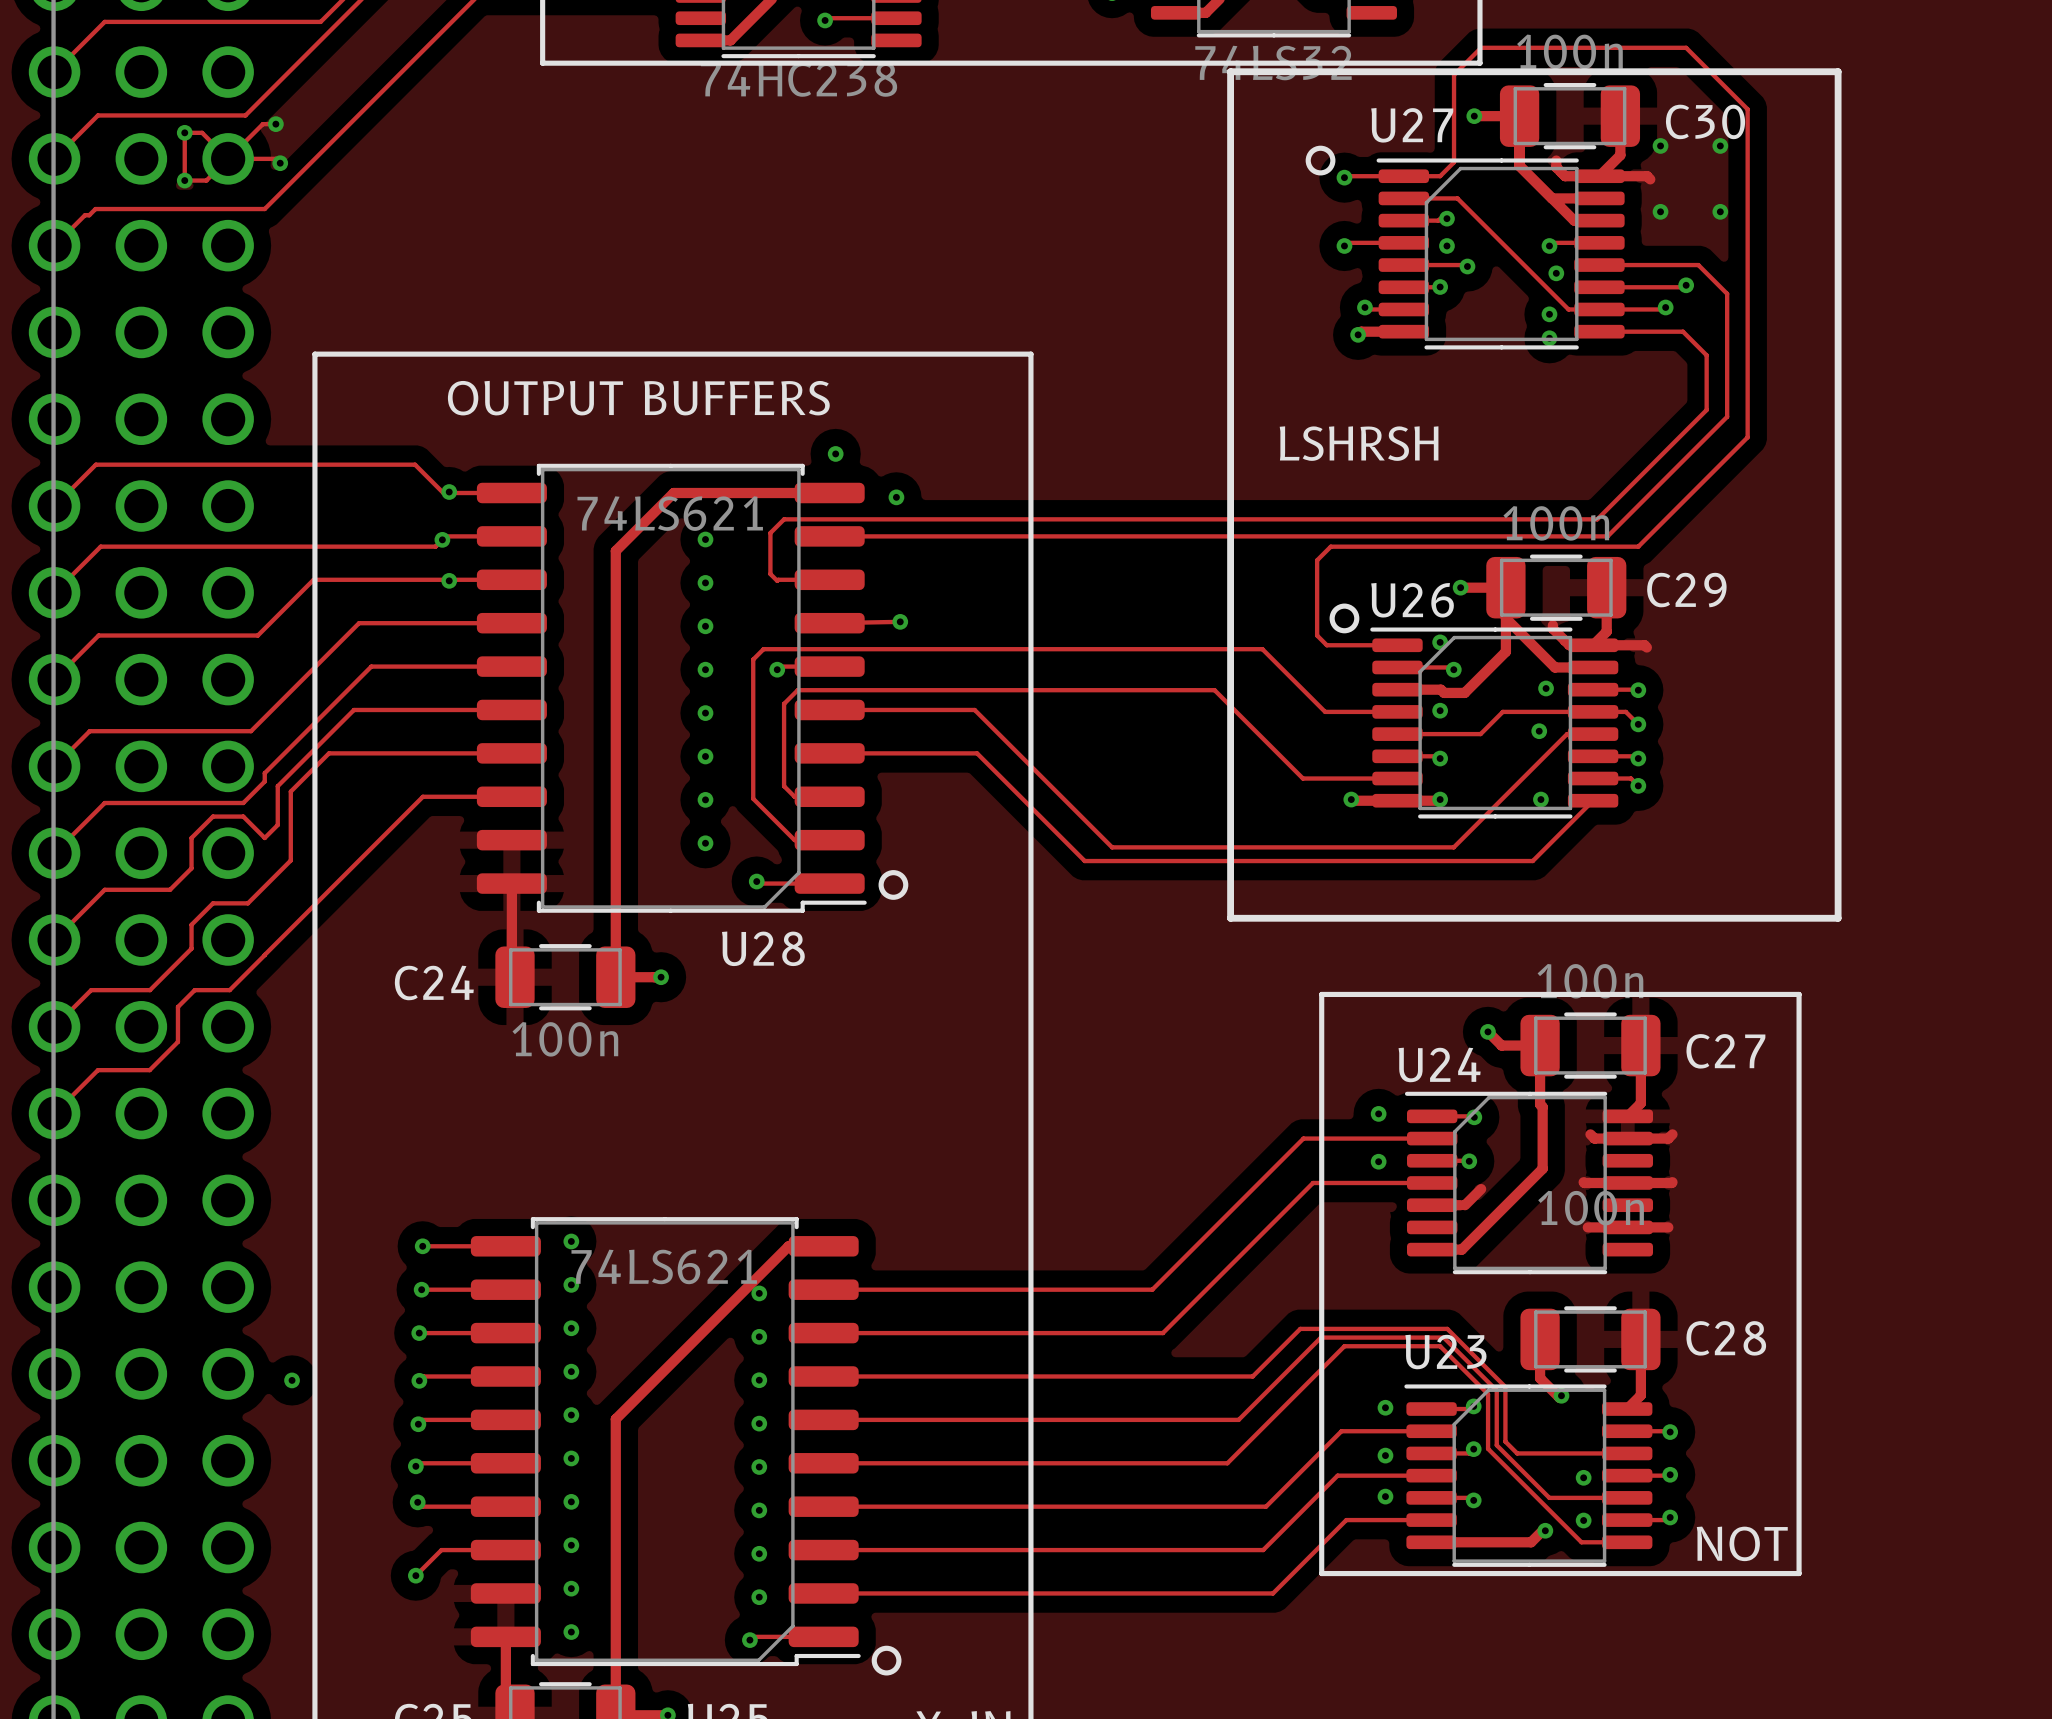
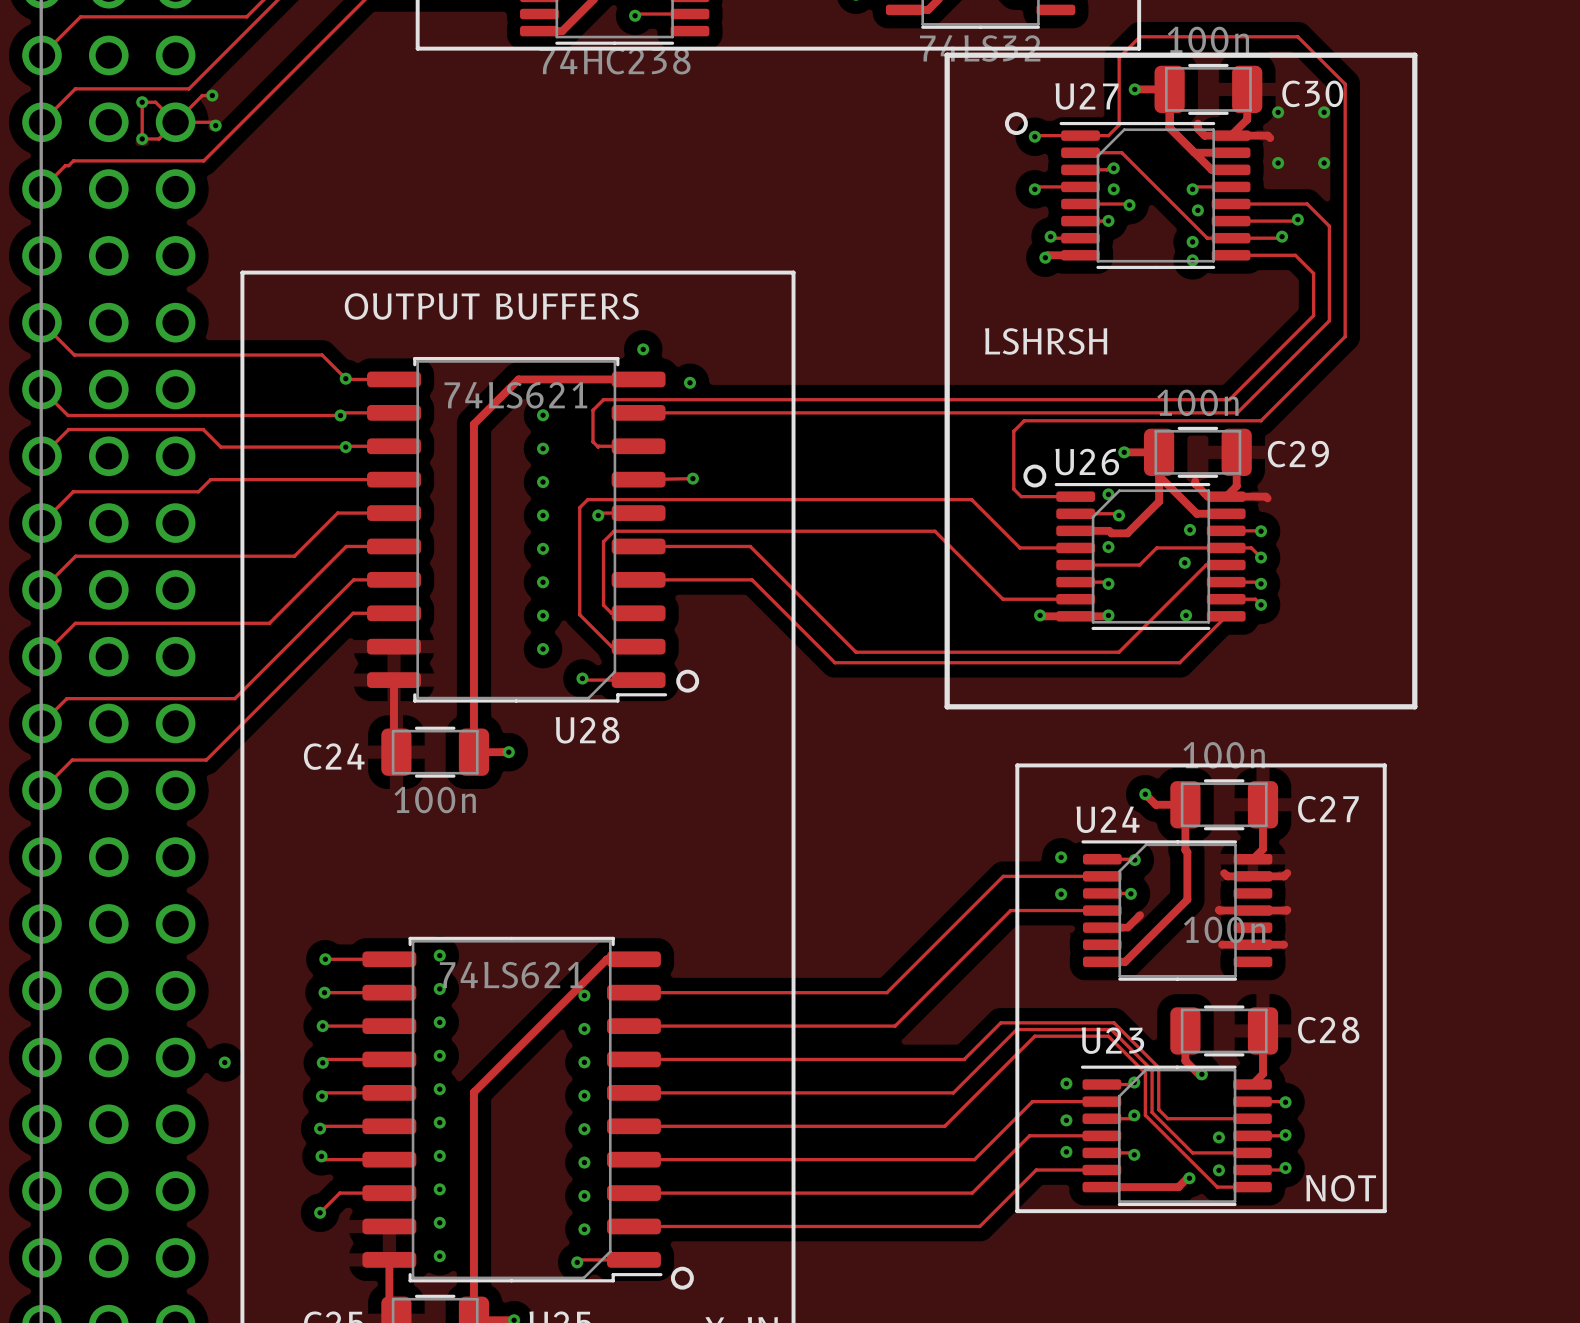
track: none -> (42, 322) (74, 355) (322, 355) (345, 378)
track: (449, 492) (443, 493) (415, 464) (95, 464) (54, 506) -> (340, 415) (68, 415) (42, 389)
track: (442, 539) (435, 546) (100, 546) (89, 558) -> (345, 447) (220, 447) (203, 429) (68, 429)
track: (449, 580) (313, 579) (257, 635) (98, 635) (95, 638) -> (276, 479) (210, 479) (198, 491) (73, 491)
track: (359, 623) (251, 731) (89, 731) -> (337, 513) (294, 556) (75, 556) (69, 562)
track: (438, 666) (371, 666) (264, 773) (264, 781) (243, 803) (104, 803) (97, 809) -> (346, 546) (269, 623) (75, 623)
track: (449, 709) (353, 709) (277, 786) (277, 825) (264, 838) (243, 816) (212, 816) (191, 838) (191, 868) (170, 889) (104, 889) (86, 907) -> (353, 579) (234, 698) (66, 698)
track: (459, 753) (329, 753) (290, 791) (290, 860) (247, 903) (212, 903) (191, 924) (191, 948) (150, 990) (91, 990) -> (353, 613) (206, 760) (72, 760) (70, 762)
track: (458, 796) (422, 796) (229, 990) (194, 990) (177, 1006) (177, 1041) (149, 1070) (97, 1070) (54, 1113) -> none

